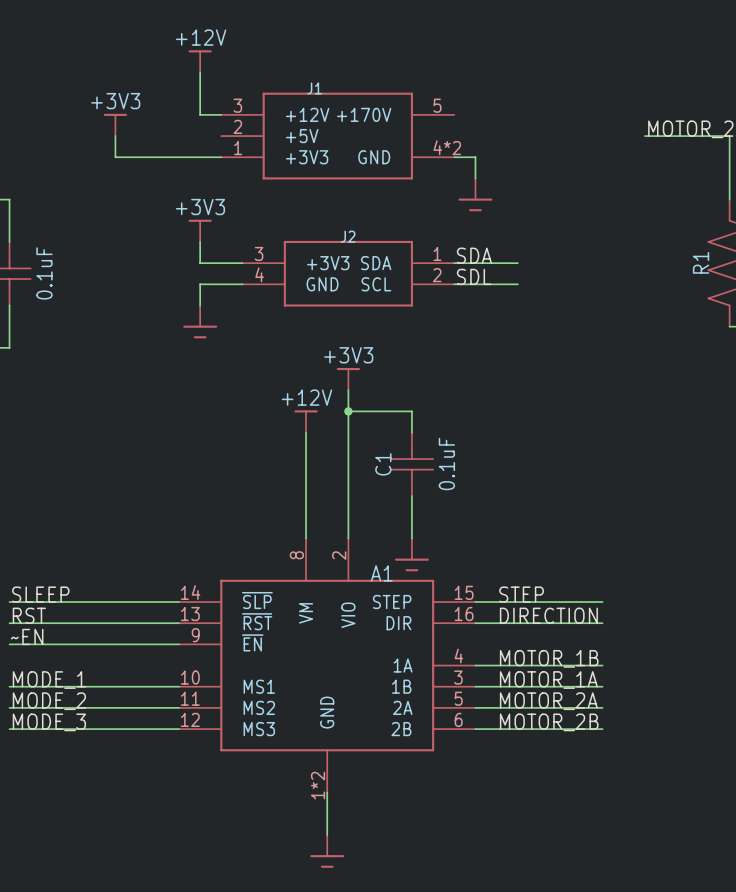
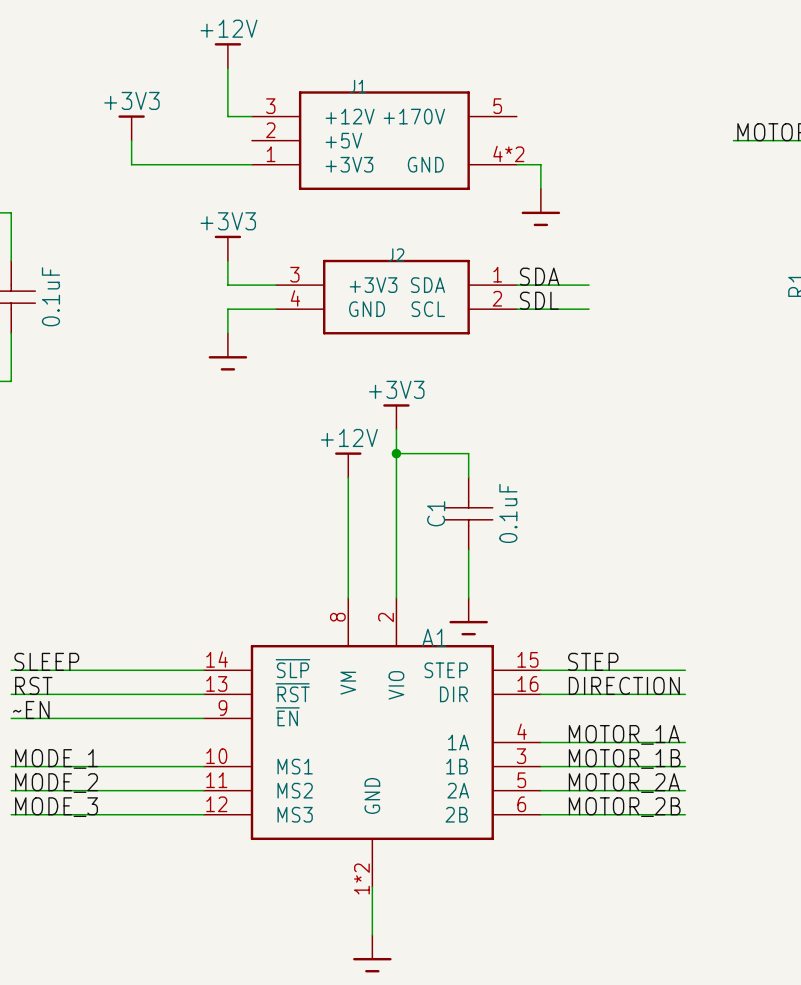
label: MOTOR_1B (549, 658) -> MOTOR_1A (624, 734)
label: MOTOR_1A (548, 680) -> MOTOR_1B (624, 758)

